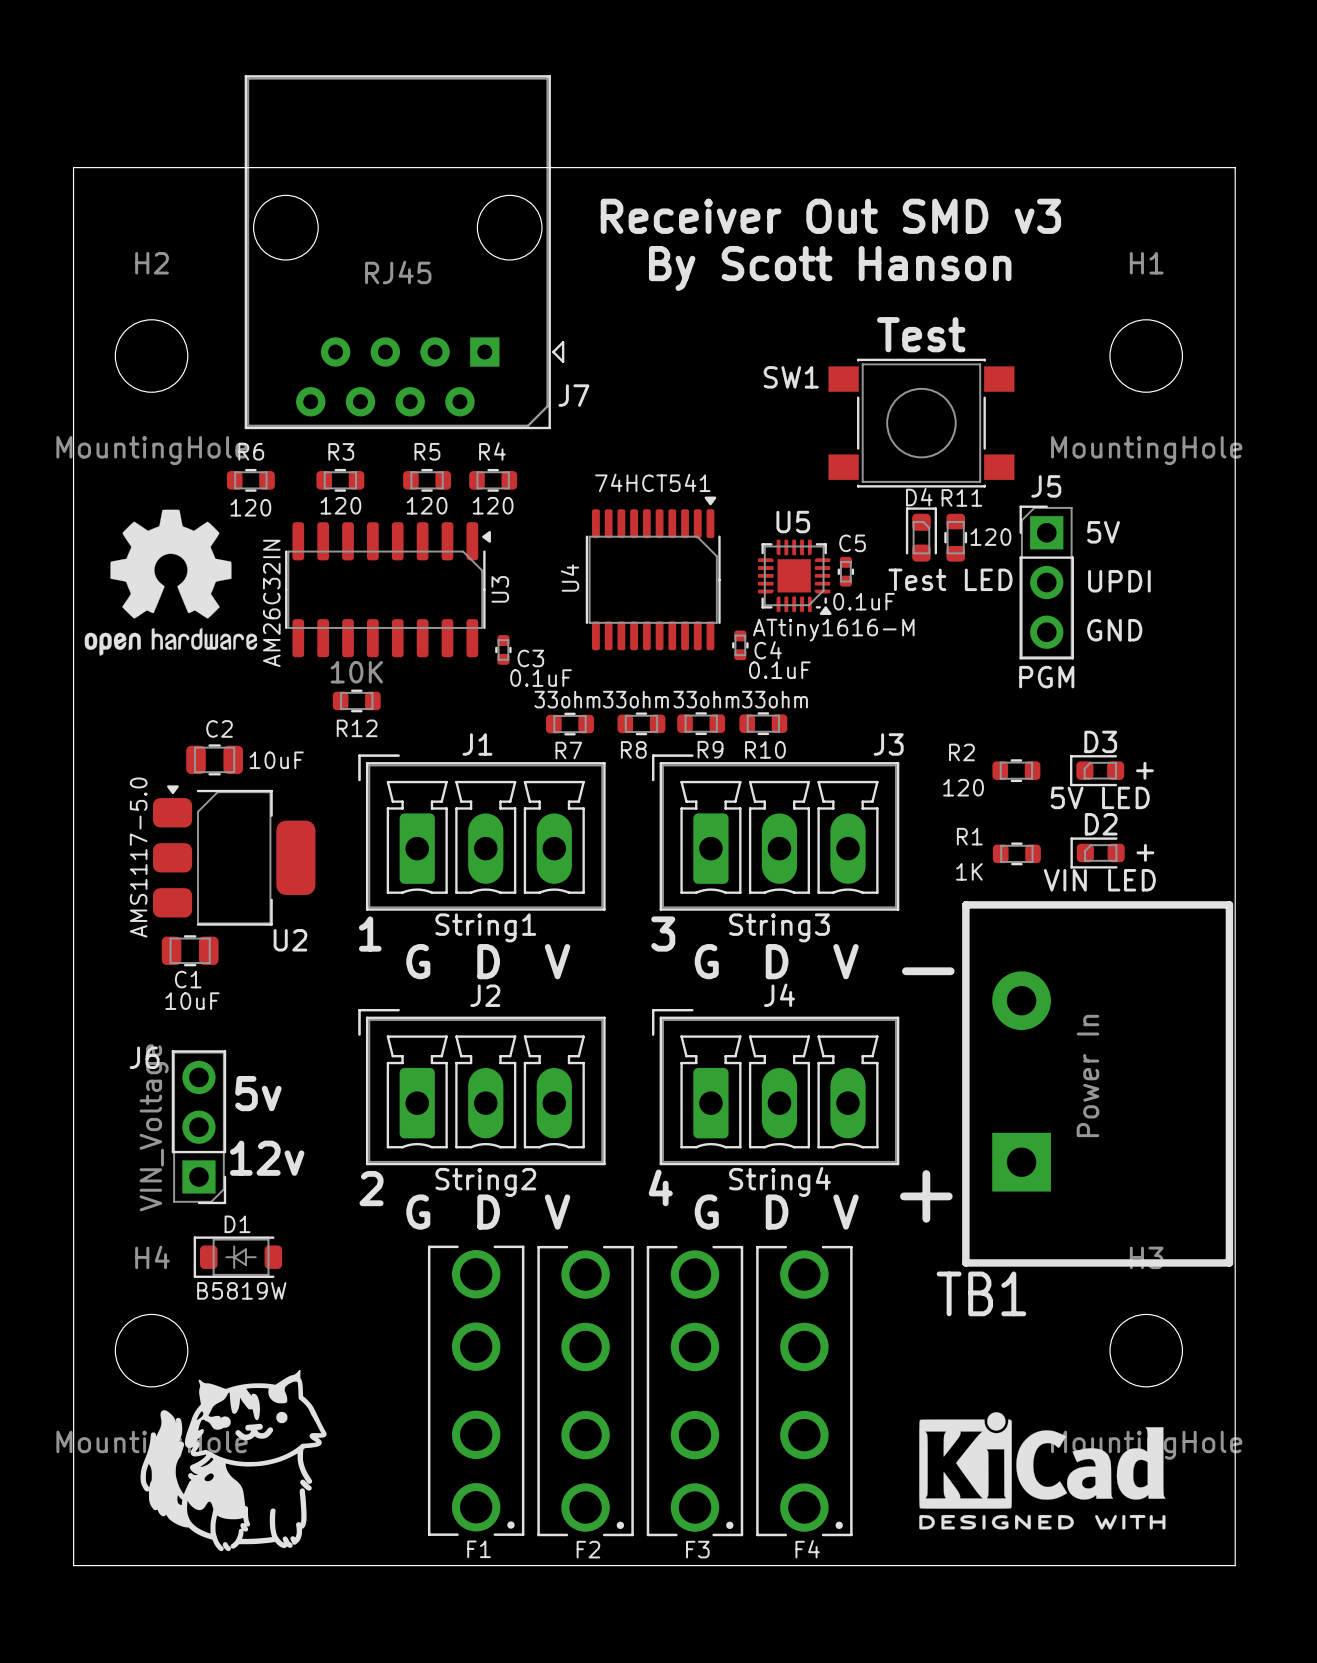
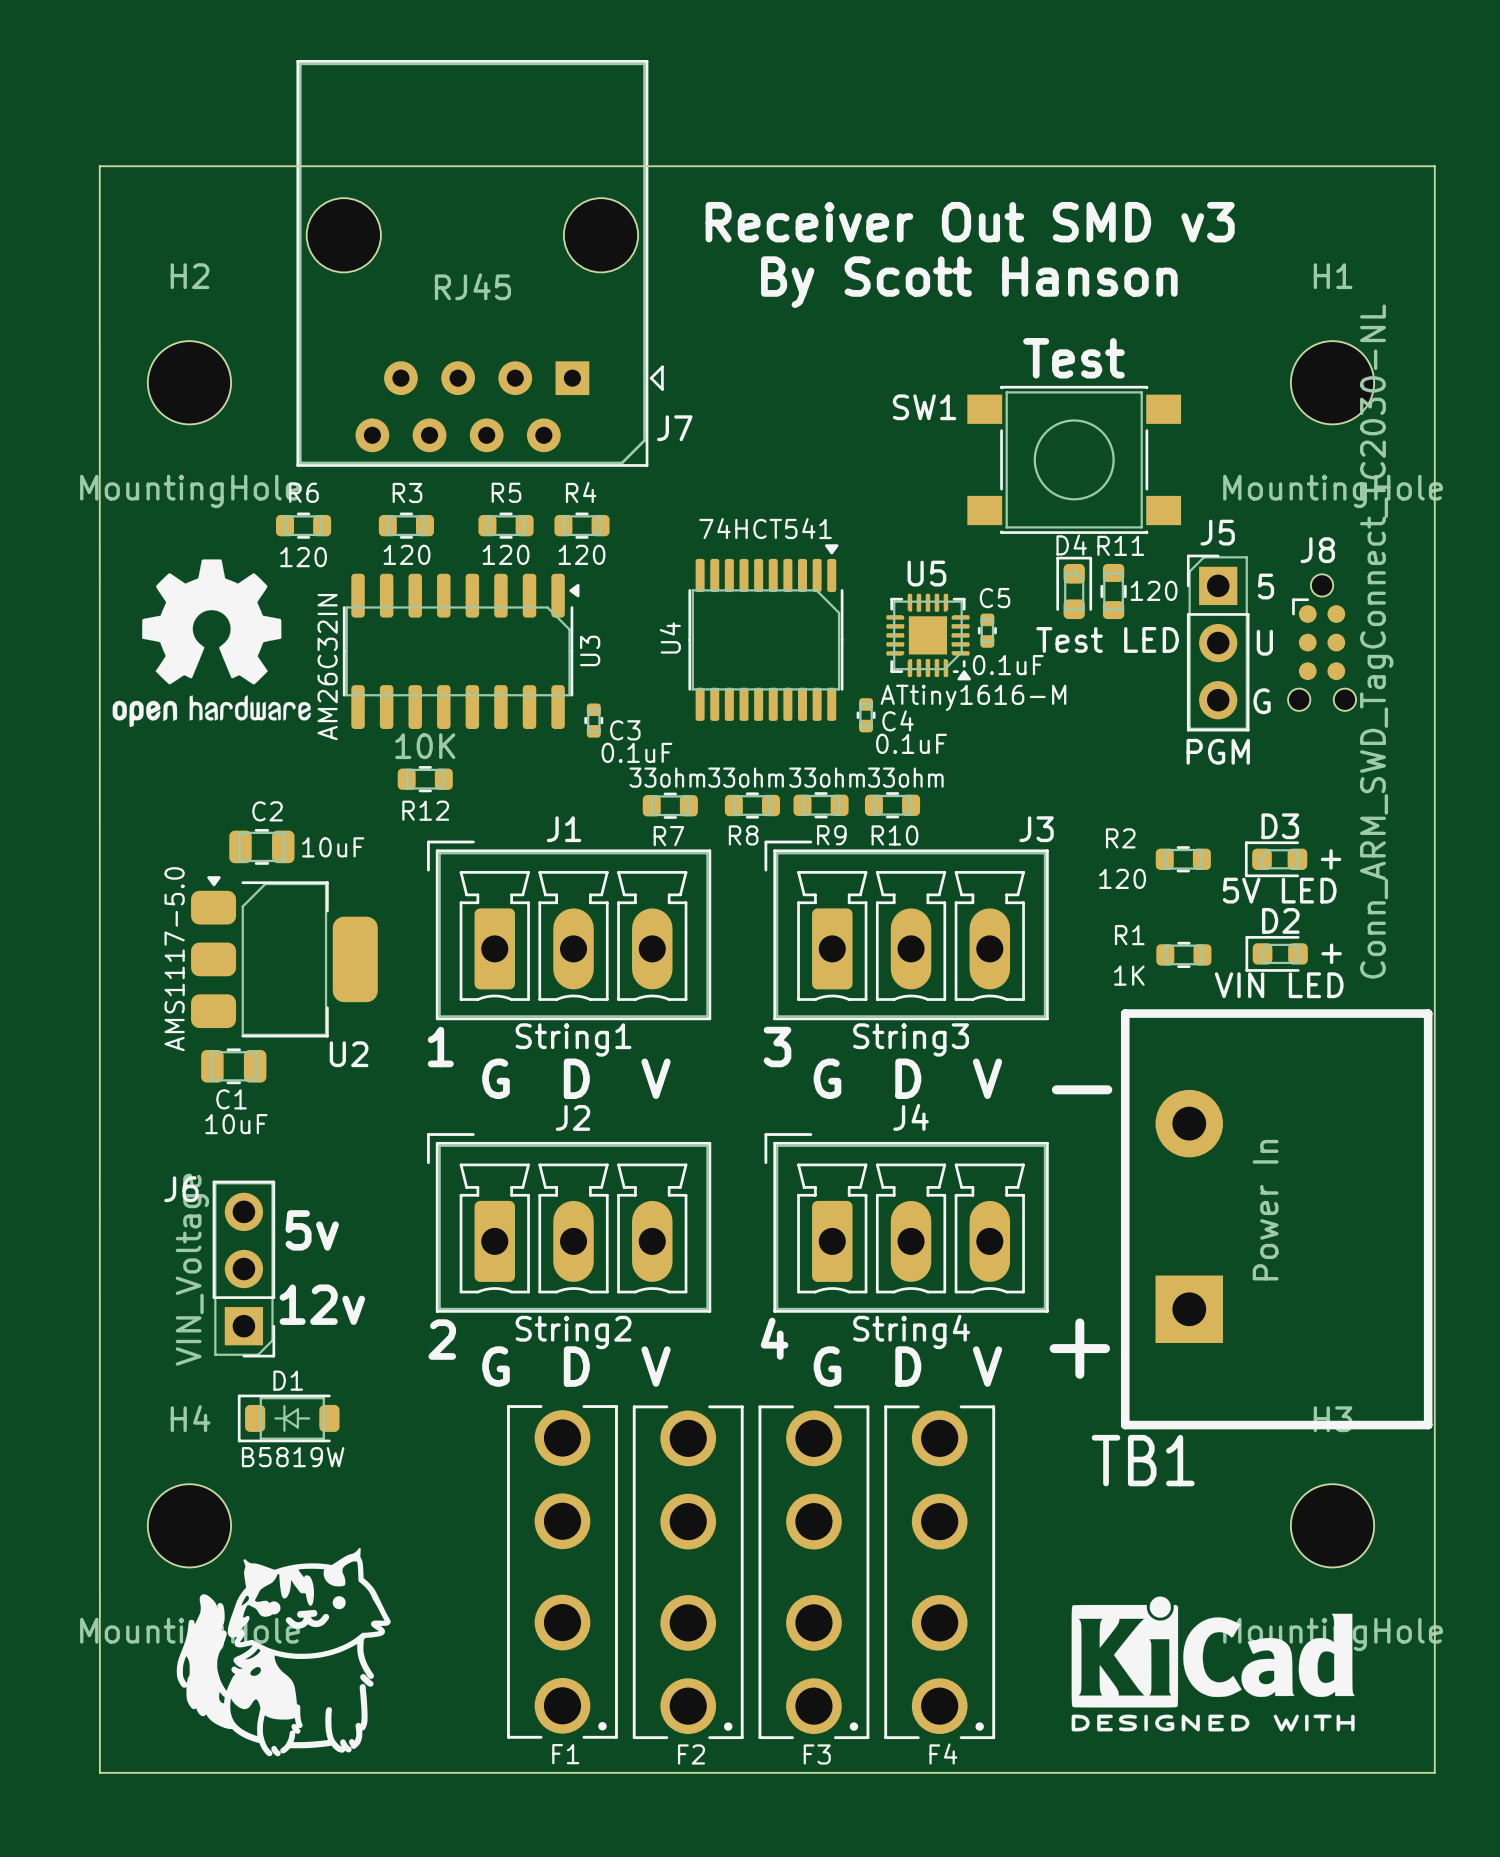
text: 5V (1103, 532) -> 5 (1266, 586)
text: UPDI (1119, 581) -> U (1264, 642)
J8: none -> Conn_ARM_SWD_TagConnect_TC2030-NL (1322, 642)
text: GND (1114, 630) -> G (1262, 701)

